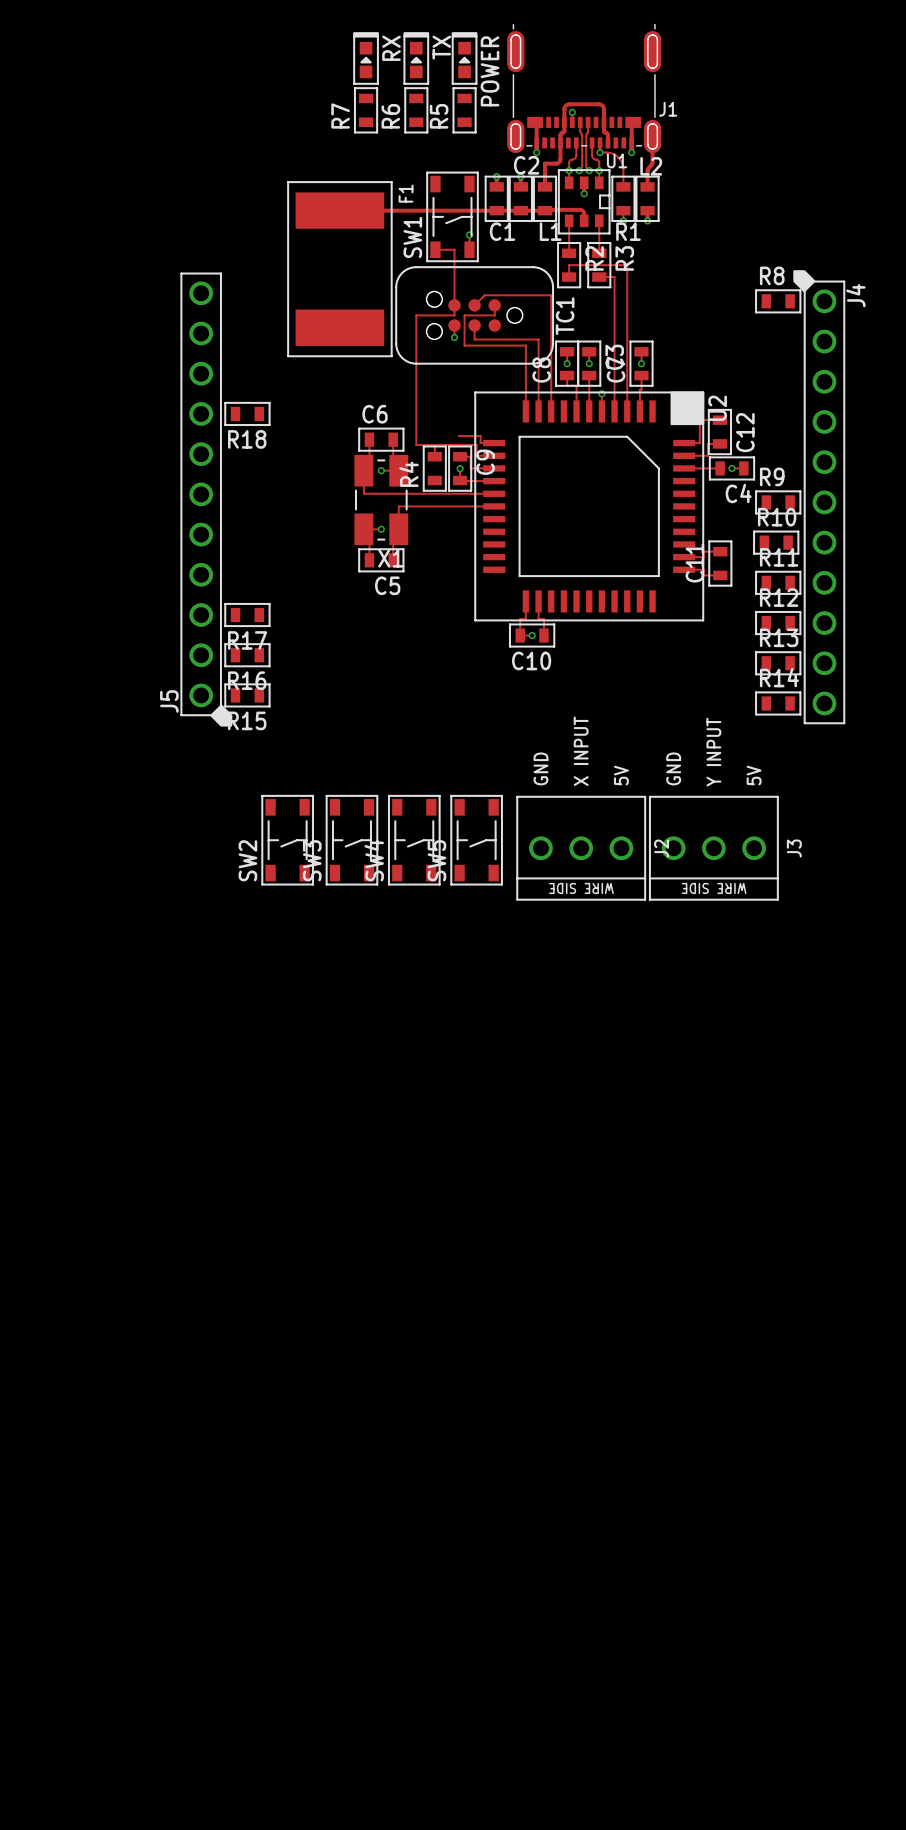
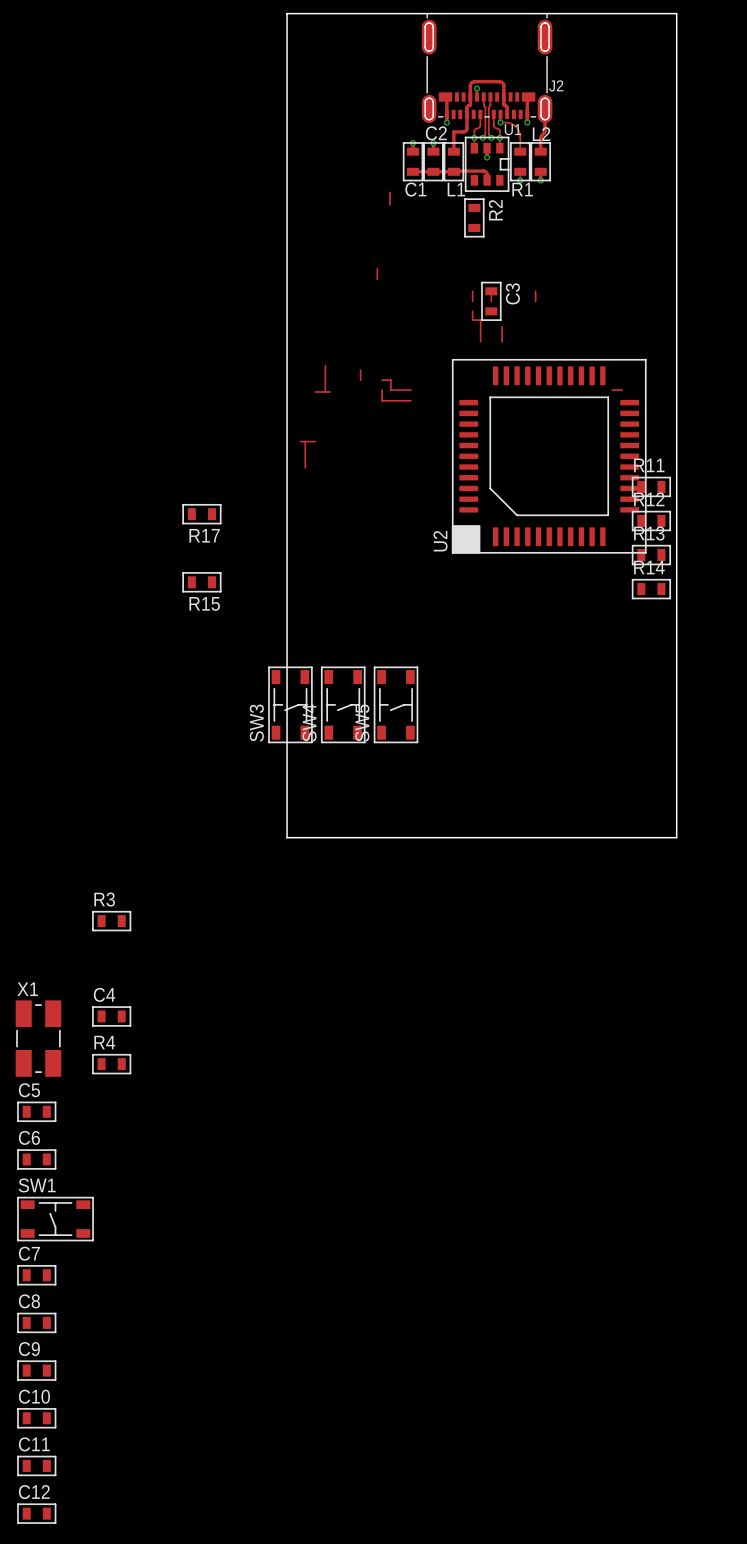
board edge: none -> (287, 13) (676, 13) (676, 837) (287, 837) (287, 13)
RX: (366, 58) -> none
TX: (416, 58) -> none
POWER: (464, 58) -> none
J1 name: J1 (668, 109) -> J2 (556, 85)
R7: (366, 110) -> none
R6: (416, 110) -> none
R5: (464, 110) -> none
track: (339, 210) (496, 210) -> none
SW1 rotation: 0° (452, 216) -> 90° clockwise (55, 1219)
SW1 position: (452, 216) -> (55, 1219)
track: (569, 220) (569, 253) -> none
track: (599, 220) (599, 253) -> none
via: (469, 234) -> none
track: (435, 249) (454, 249) (454, 315) (416, 315) (416, 444) (476, 444) (476, 455) (494, 455) -> none
R3 name position: R3 (624, 258) -> R3 (104, 899)
R3 rotation: 0° (599, 265) -> 90° clockwise (111, 921)
R3 position: (599, 265) -> (111, 921)
F1: (339, 269) -> none
track: (569, 277) (569, 265) (627, 265) (627, 411) -> none
track: (599, 277) (614, 277) (614, 411) -> none
R8: (778, 301) -> none
track: (474, 305) (484, 295) (551, 295) (551, 411) -> none
track: (494, 305) (494, 315) (464, 315) (464, 345) (525, 345) (525, 411) -> none
TC1: (474, 315) -> none
track: (474, 325) (474, 339) (538, 339) (538, 411) -> none
via: (454, 337) -> none
C8 rotation: 0° (567, 363) -> 90° clockwise (36, 1322)
C8 position: (567, 363) -> (36, 1322)
via: (567, 363) -> none
via: (589, 363) -> none
C7 rotation: 0° (641, 363) -> 90° clockwise (36, 1275)
C7 position: (641, 363) -> (36, 1275)
via: (641, 363) -> none
track: (589, 375) (589, 411) -> none
track: (641, 375) (639, 411) -> none
via: (601, 393) -> none
R18: (247, 413) -> none
track: (719, 419) (699, 419) (699, 443) (684, 443) -> none
C12 rotation: 0° (719, 432) -> 90° clockwise (36, 1513)
C12 position: (719, 432) -> (36, 1513)
C12 name position: C12 (745, 432) -> C12 (34, 1492)
track: (458, 436) (480, 436) (480, 443) (494, 443) -> none
track: (369, 439) (369, 470) (363, 470) (363, 493) (494, 493) -> none
C6 position: (381, 439) -> (36, 1159)
track: (719, 443) (707, 443) (707, 455) (684, 455) -> none
C9 name position: C9 (485, 462) -> C9 (29, 1349)
R4 rotation: 0° (434, 468) -> 90° clockwise (111, 1064)
R4 position: (434, 468) -> (111, 1064)
C9 rotation: 0° (460, 468) -> 90° clockwise (36, 1370)
C9 position: (460, 468) -> (36, 1370)
via: (460, 468) -> none
track: (684, 468) (720, 468) -> none
C4 position: (731, 468) -> (111, 1016)
via: (731, 468) -> none
via: (381, 470) -> none
C4 name position: C4 (738, 493) -> C4 (104, 994)
J4: (819, 497) -> none
J5: (206, 499) -> none
X1 position: (381, 500) -> (38, 1038)
R9: (778, 502) -> none
track: (494, 506) (398, 506) (398, 529) (393, 529) (393, 560) -> none
U2 rotation: 0° (589, 506) -> 180° (549, 456)
via: (381, 529) -> none
R10: (776, 542) -> none
track: (720, 551) (703, 551) (703, 557) (684, 557) -> none
X1 name position: X1 (390, 558) -> X1 (27, 989)
C5 position: (381, 560) -> (36, 1111)
C11 rotation: 0° (720, 563) -> 90° clockwise (36, 1465)
C11 position: (720, 563) -> (36, 1465)
track: (684, 569) (703, 569) (703, 575) (720, 575) -> none
C5 name position: C5 (387, 585) -> C5 (29, 1090)
track: (525, 601) (525, 619) (520, 619) (520, 635) (532, 635) -> none
track: (538, 601) (538, 619) (544, 619) (544, 635) -> none
C10 position: (532, 635) -> (36, 1418)
via: (532, 635) -> none
R16: (247, 655) -> none
C10 name position: C10 (531, 660) -> C10 (34, 1396)
SW2: (287, 840) -> none
J2: (581, 848) -> none
J3: (713, 848) -> none

